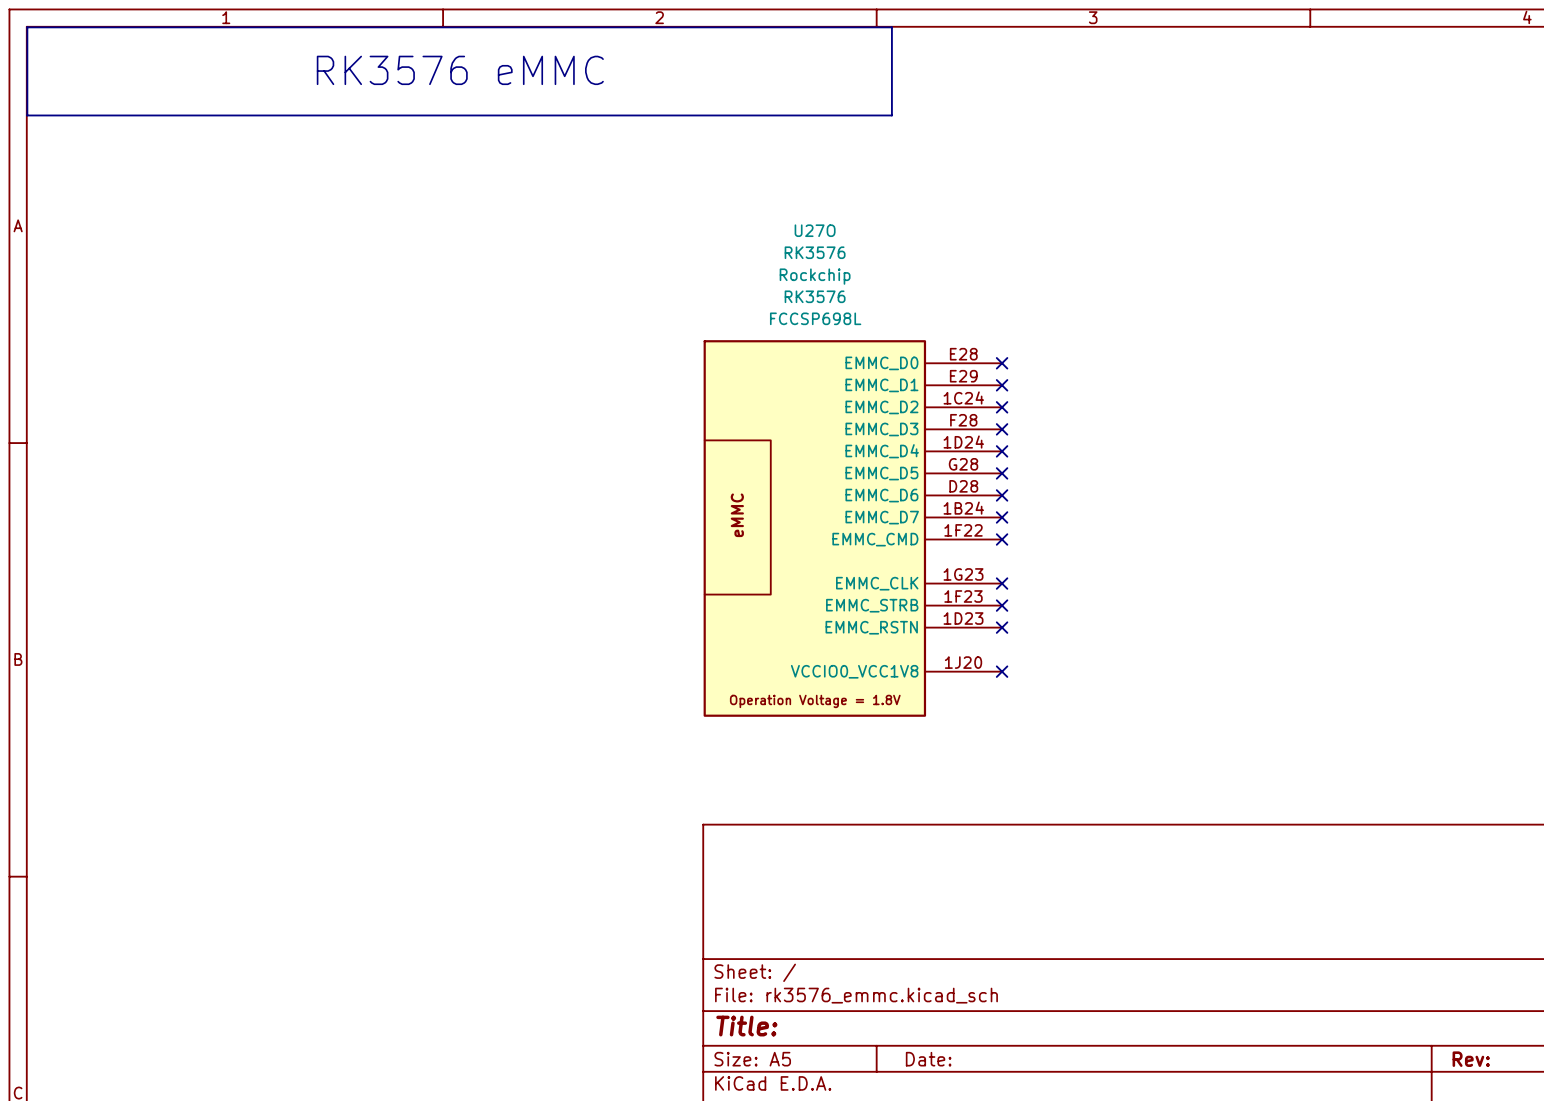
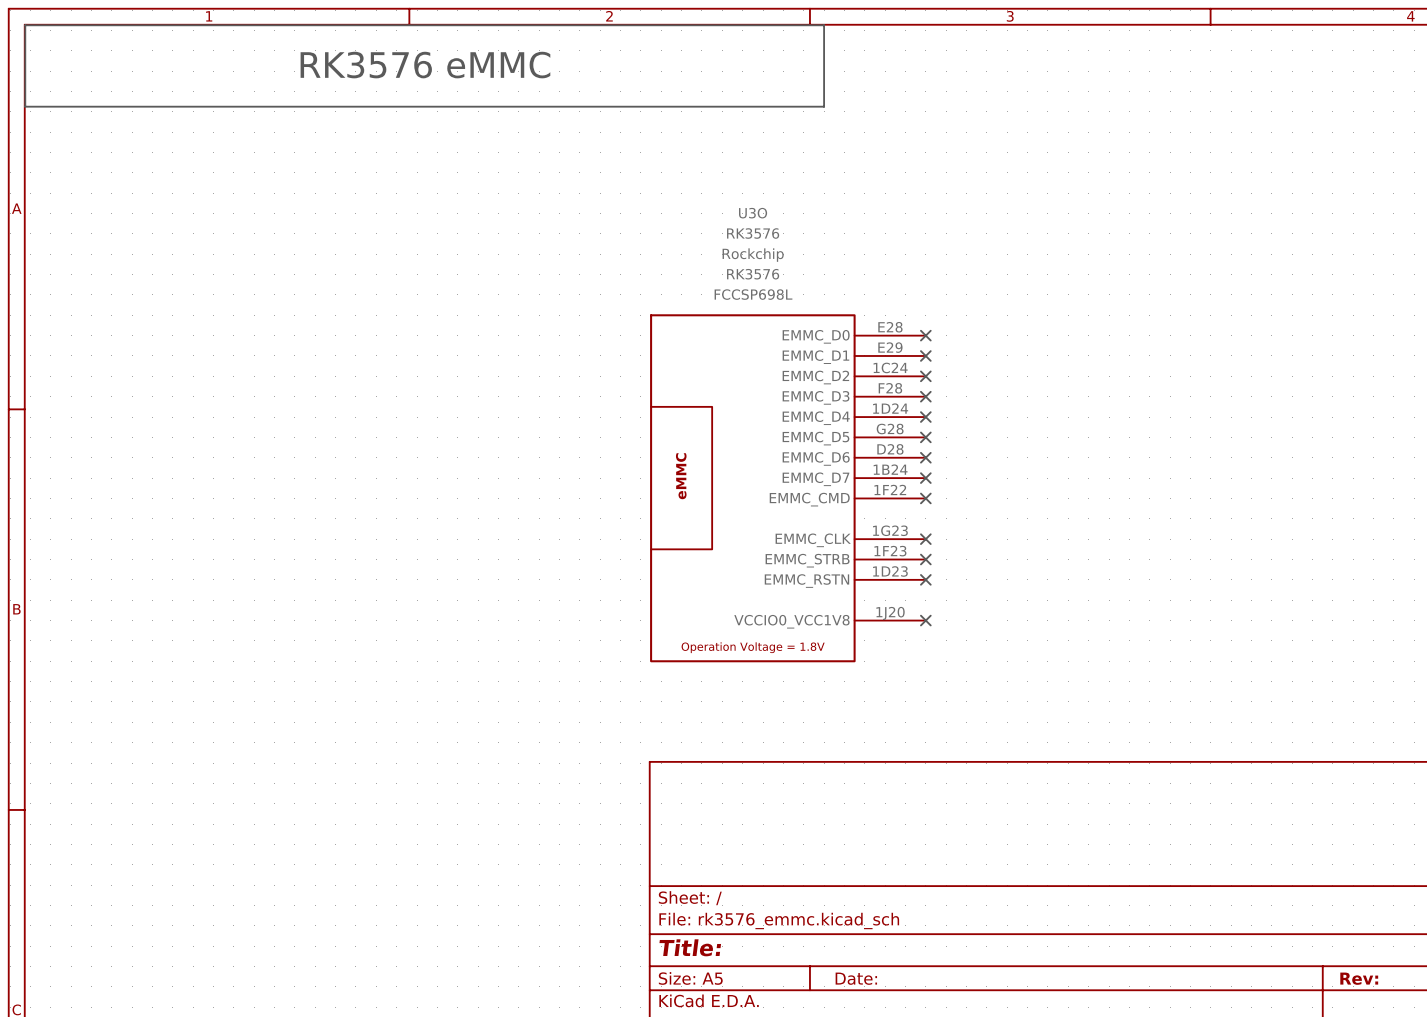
U27O name: U27O (815, 230) -> U3O (753, 213)

